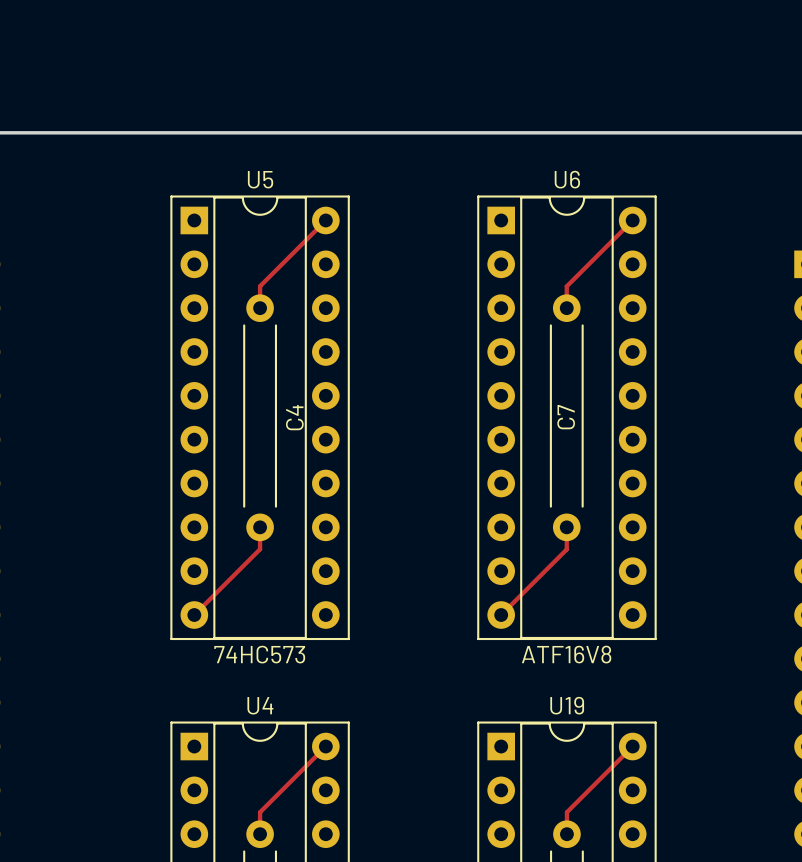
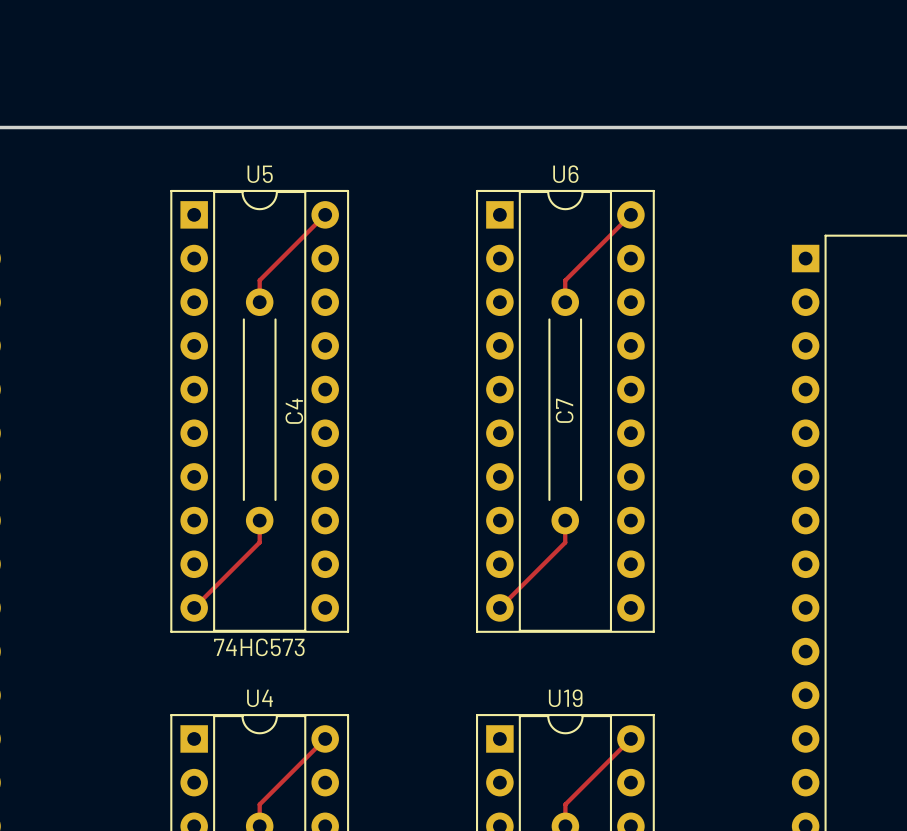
U6 value: ATF16V8 (566, 654) -> none

